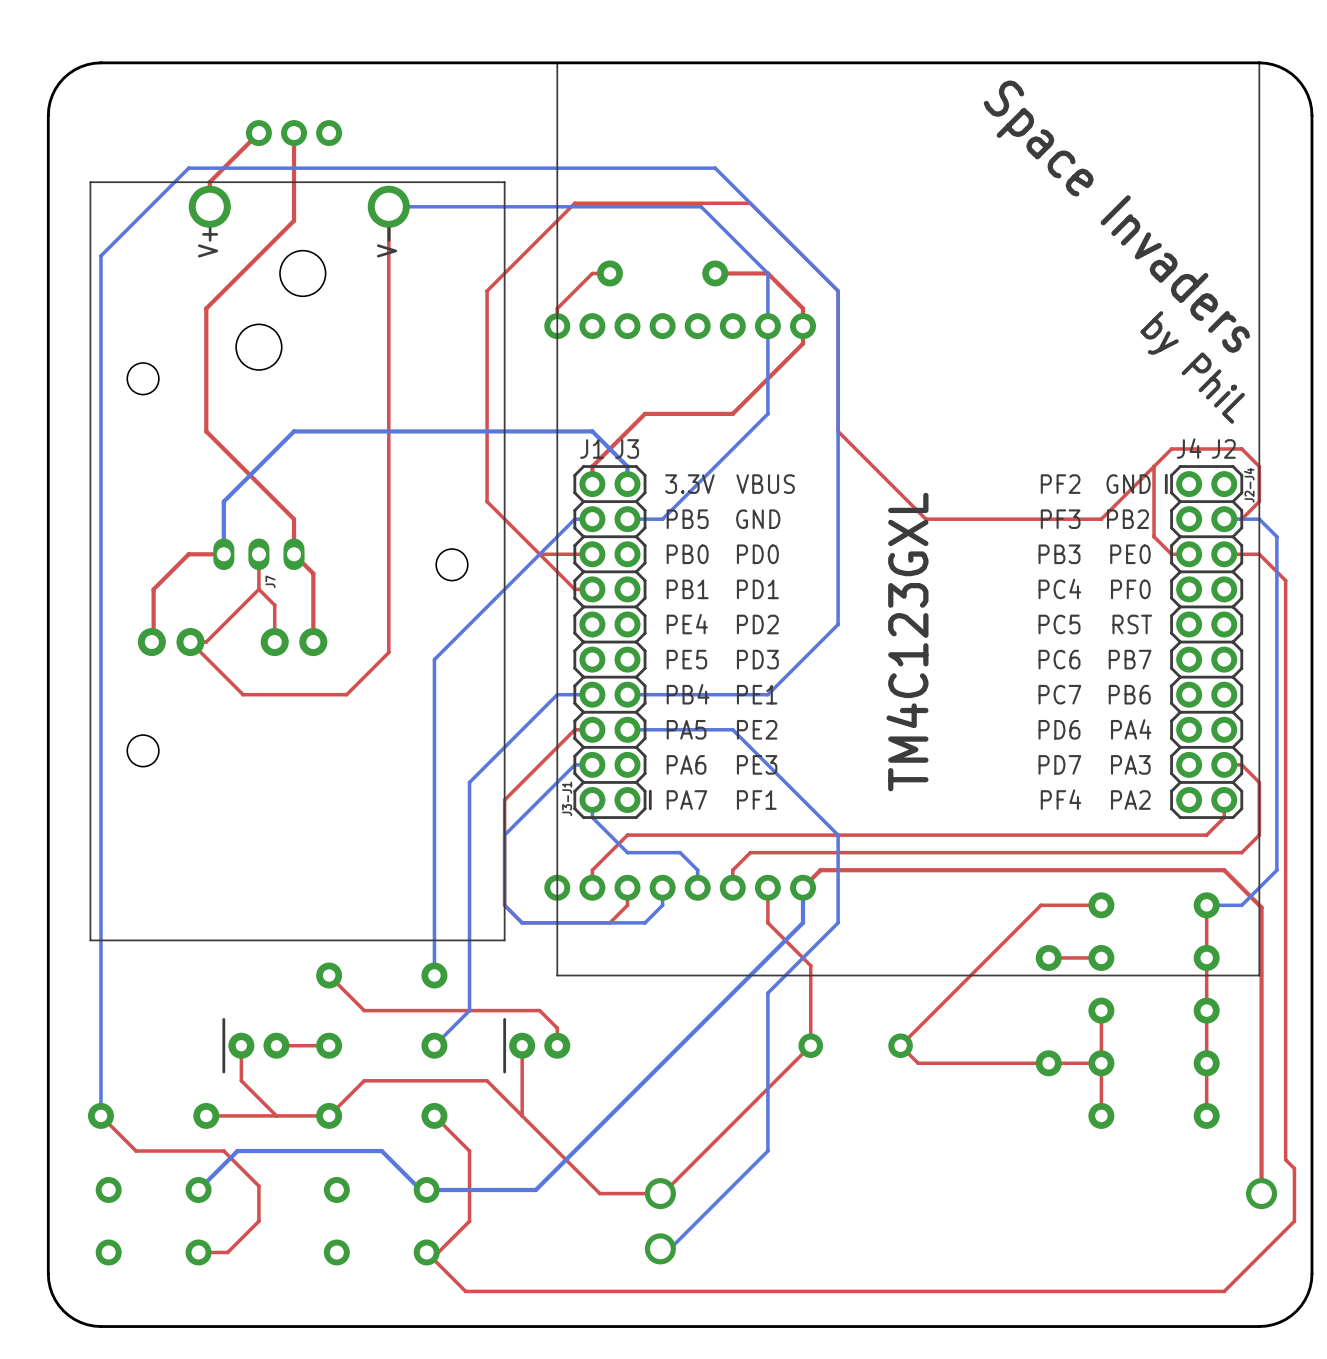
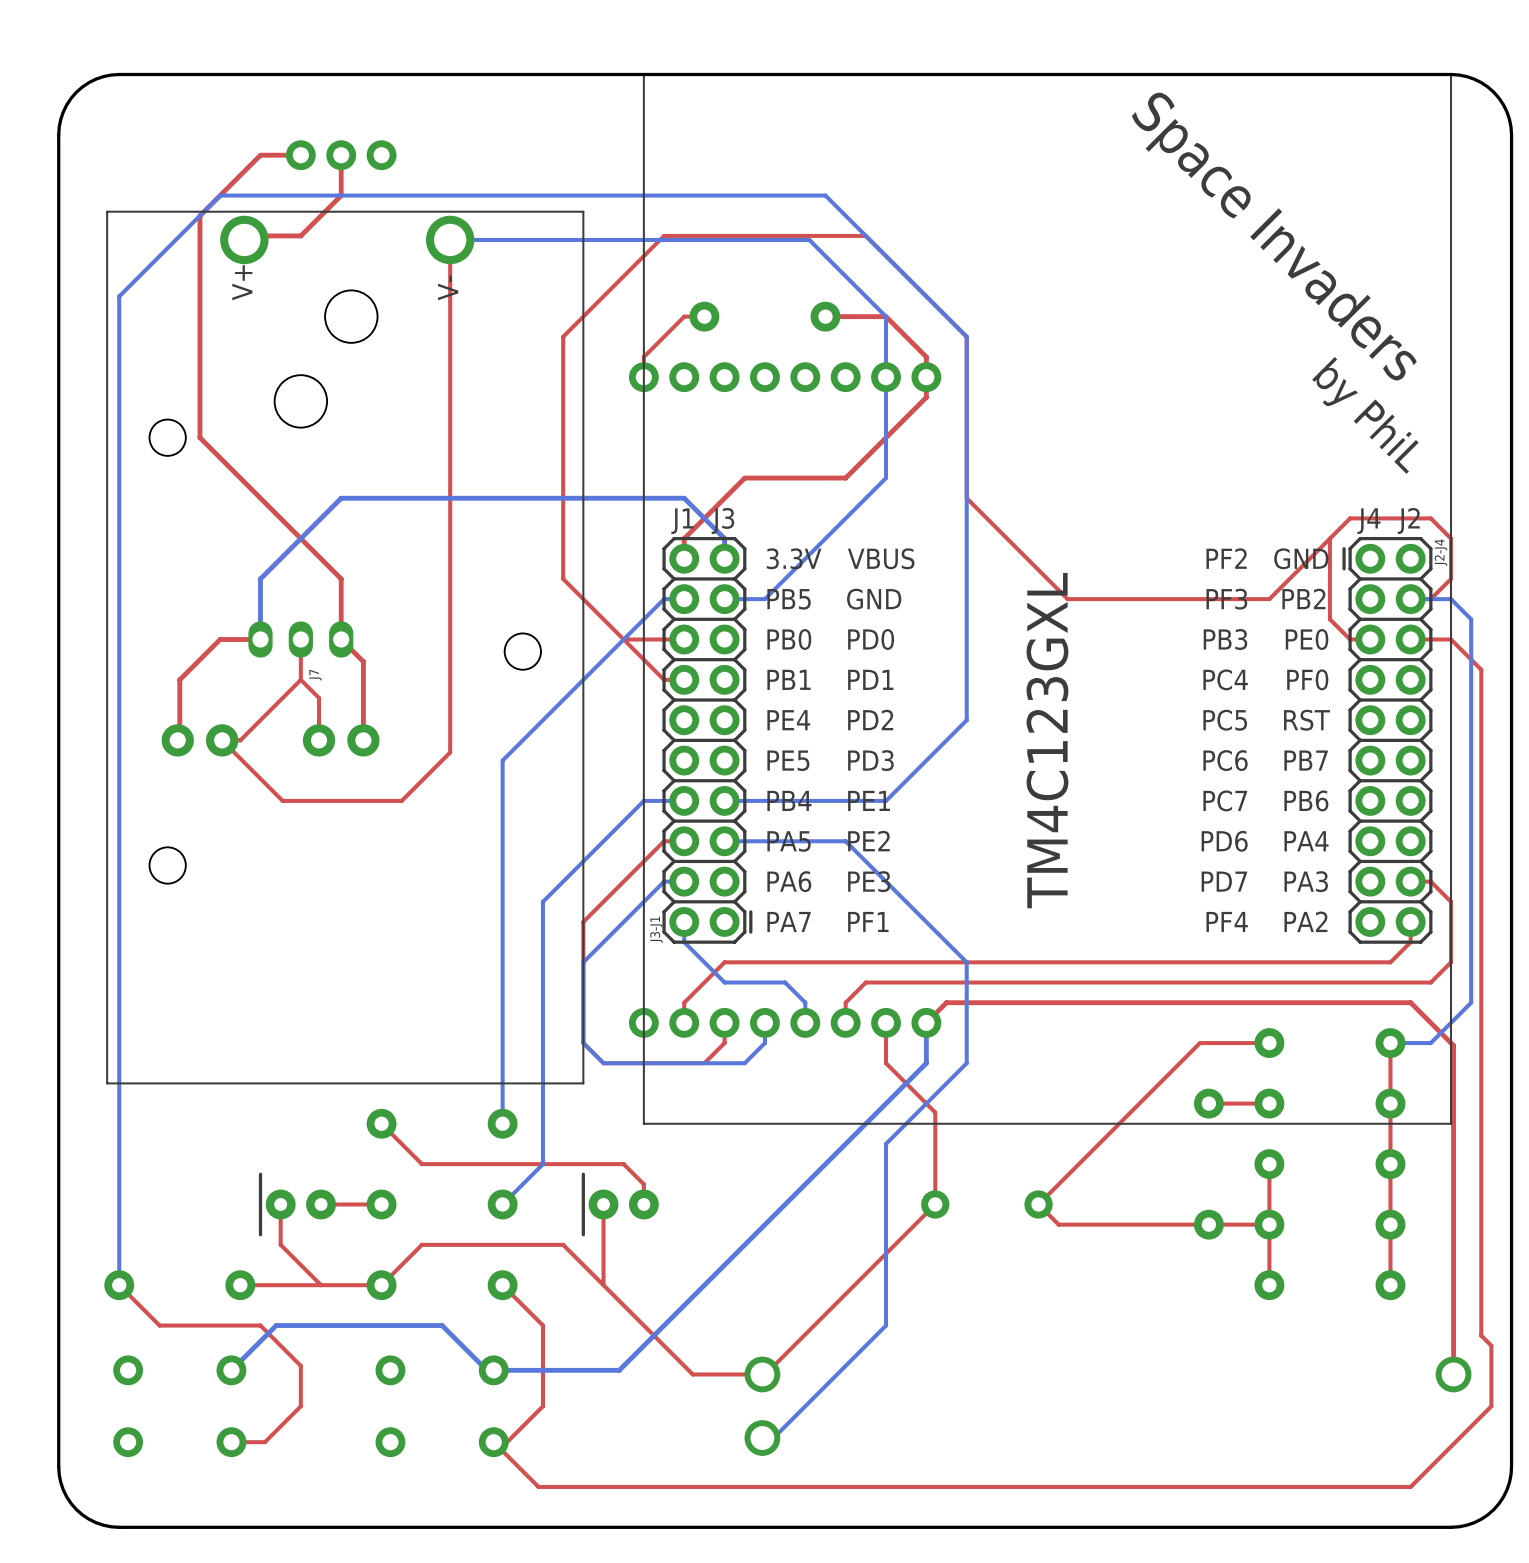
top track: (258, 133) (209, 182) (209, 206) -> (341, 195) (300, 235) (248, 235) (244, 239)
top track: (294, 168) (294, 220) (206, 308) (206, 431) (294, 519) -> (300, 155) (260, 155) (199, 215) (199, 437) (341, 578) (341, 599)

